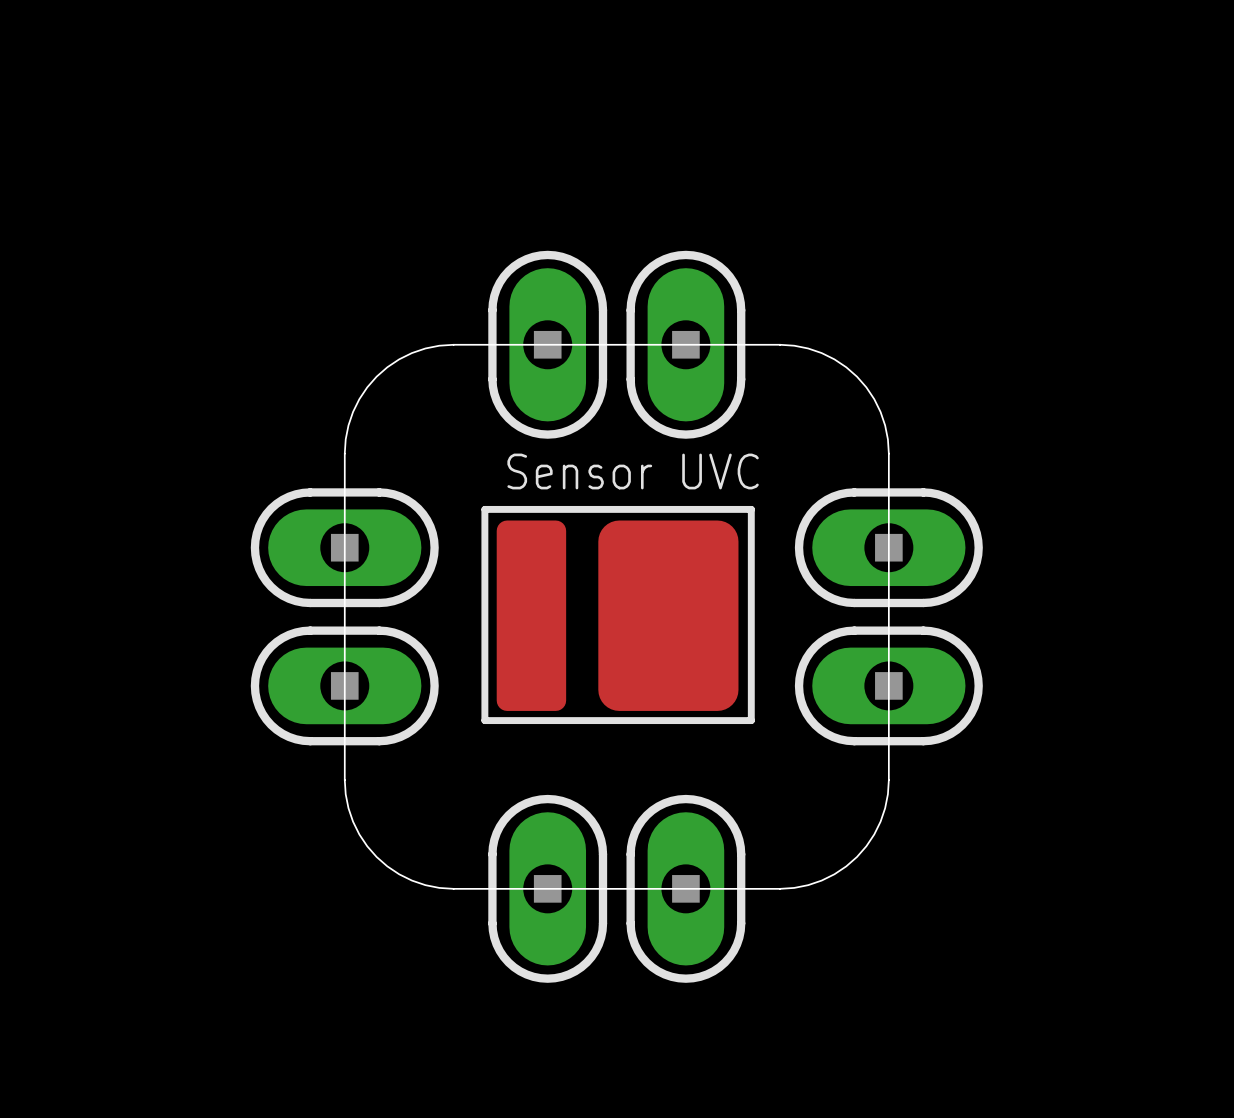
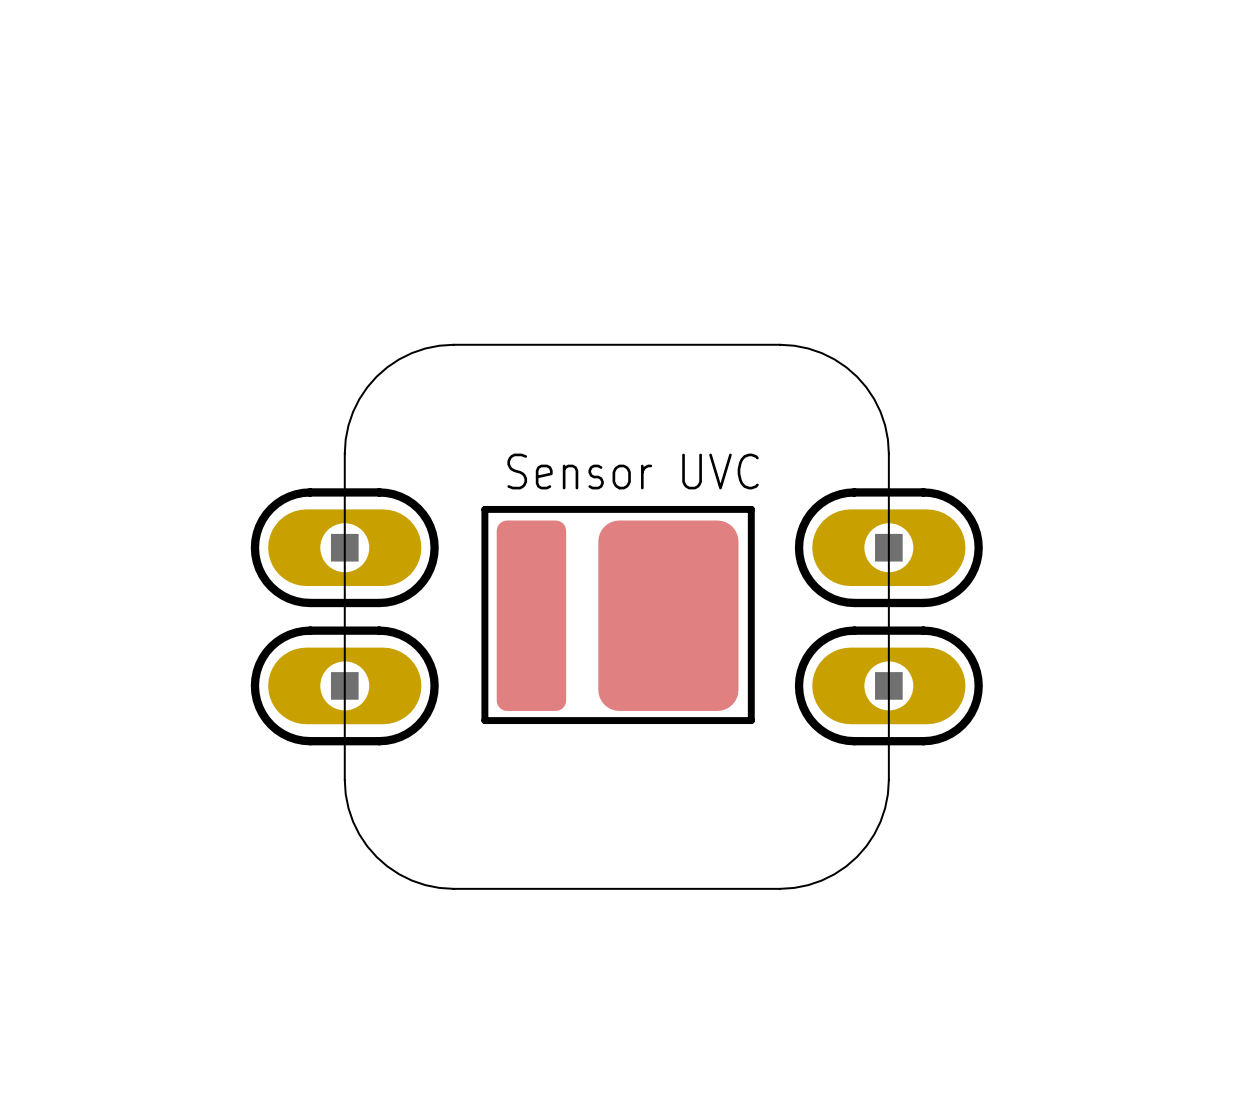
part: (616, 344) -> none
part: (616, 888) -> none

